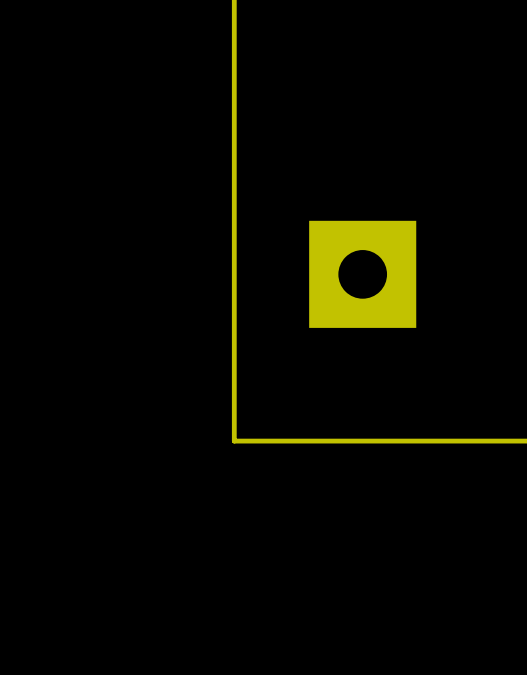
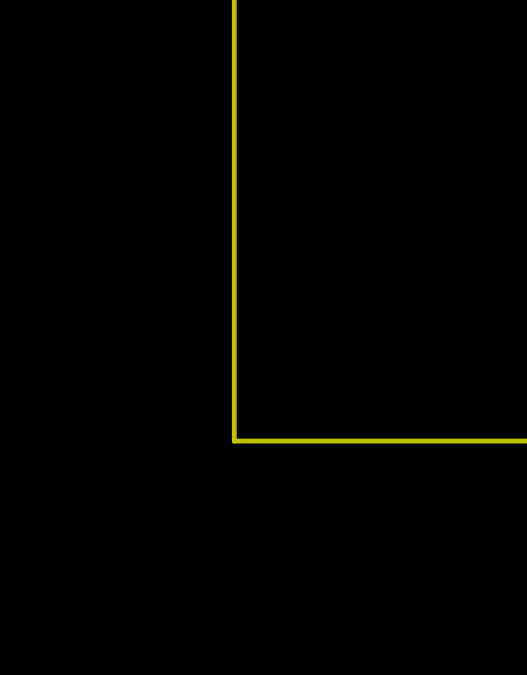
part: (362, 274) -> none

